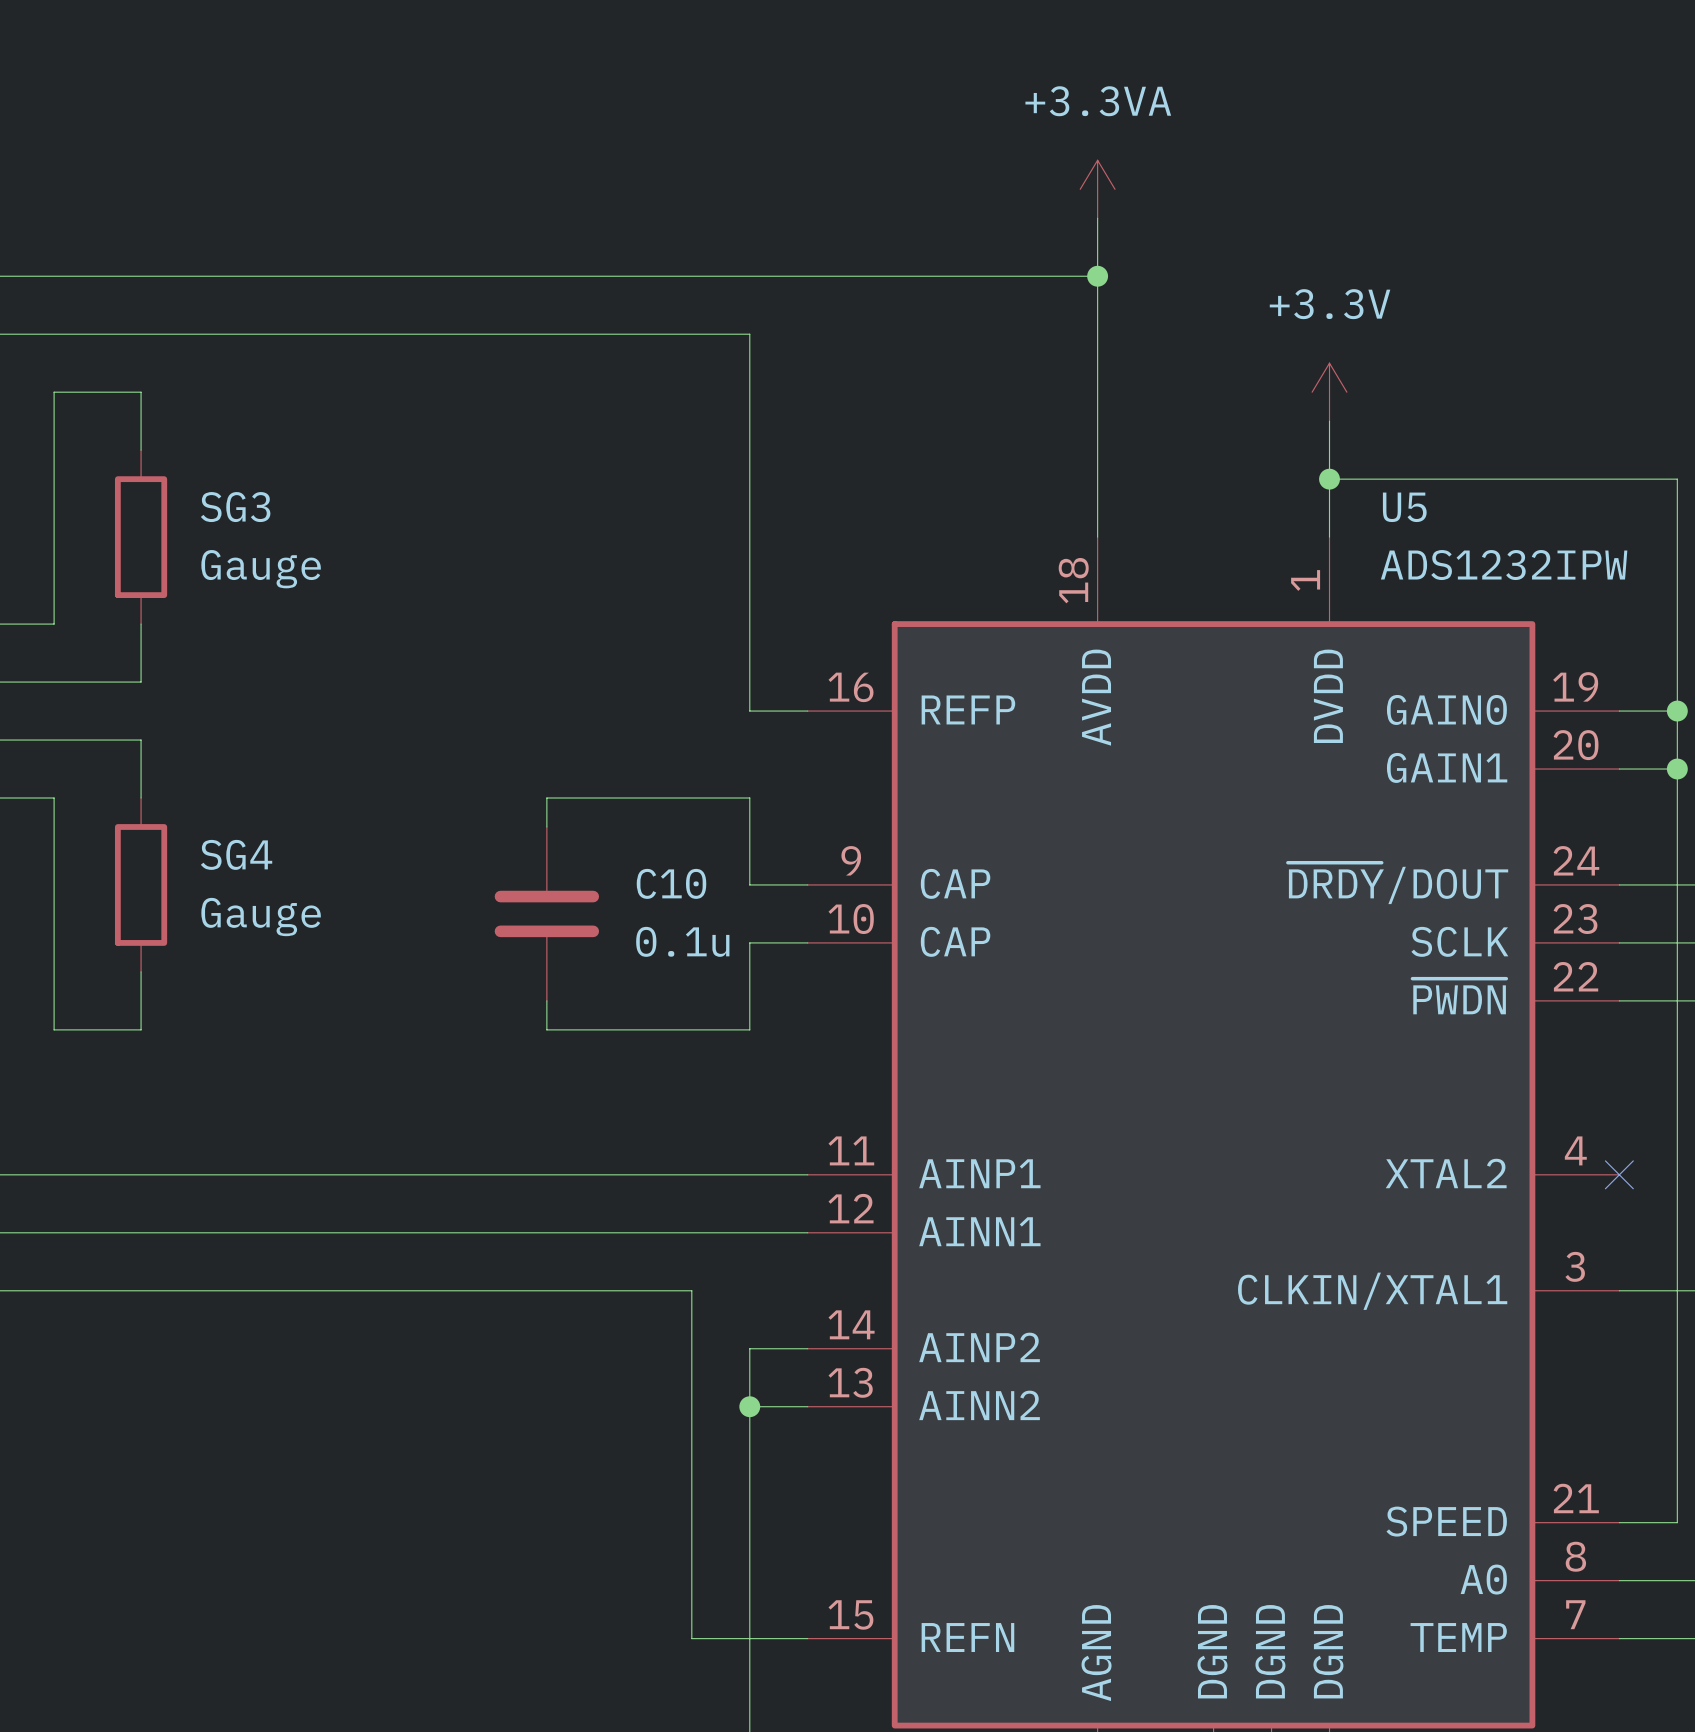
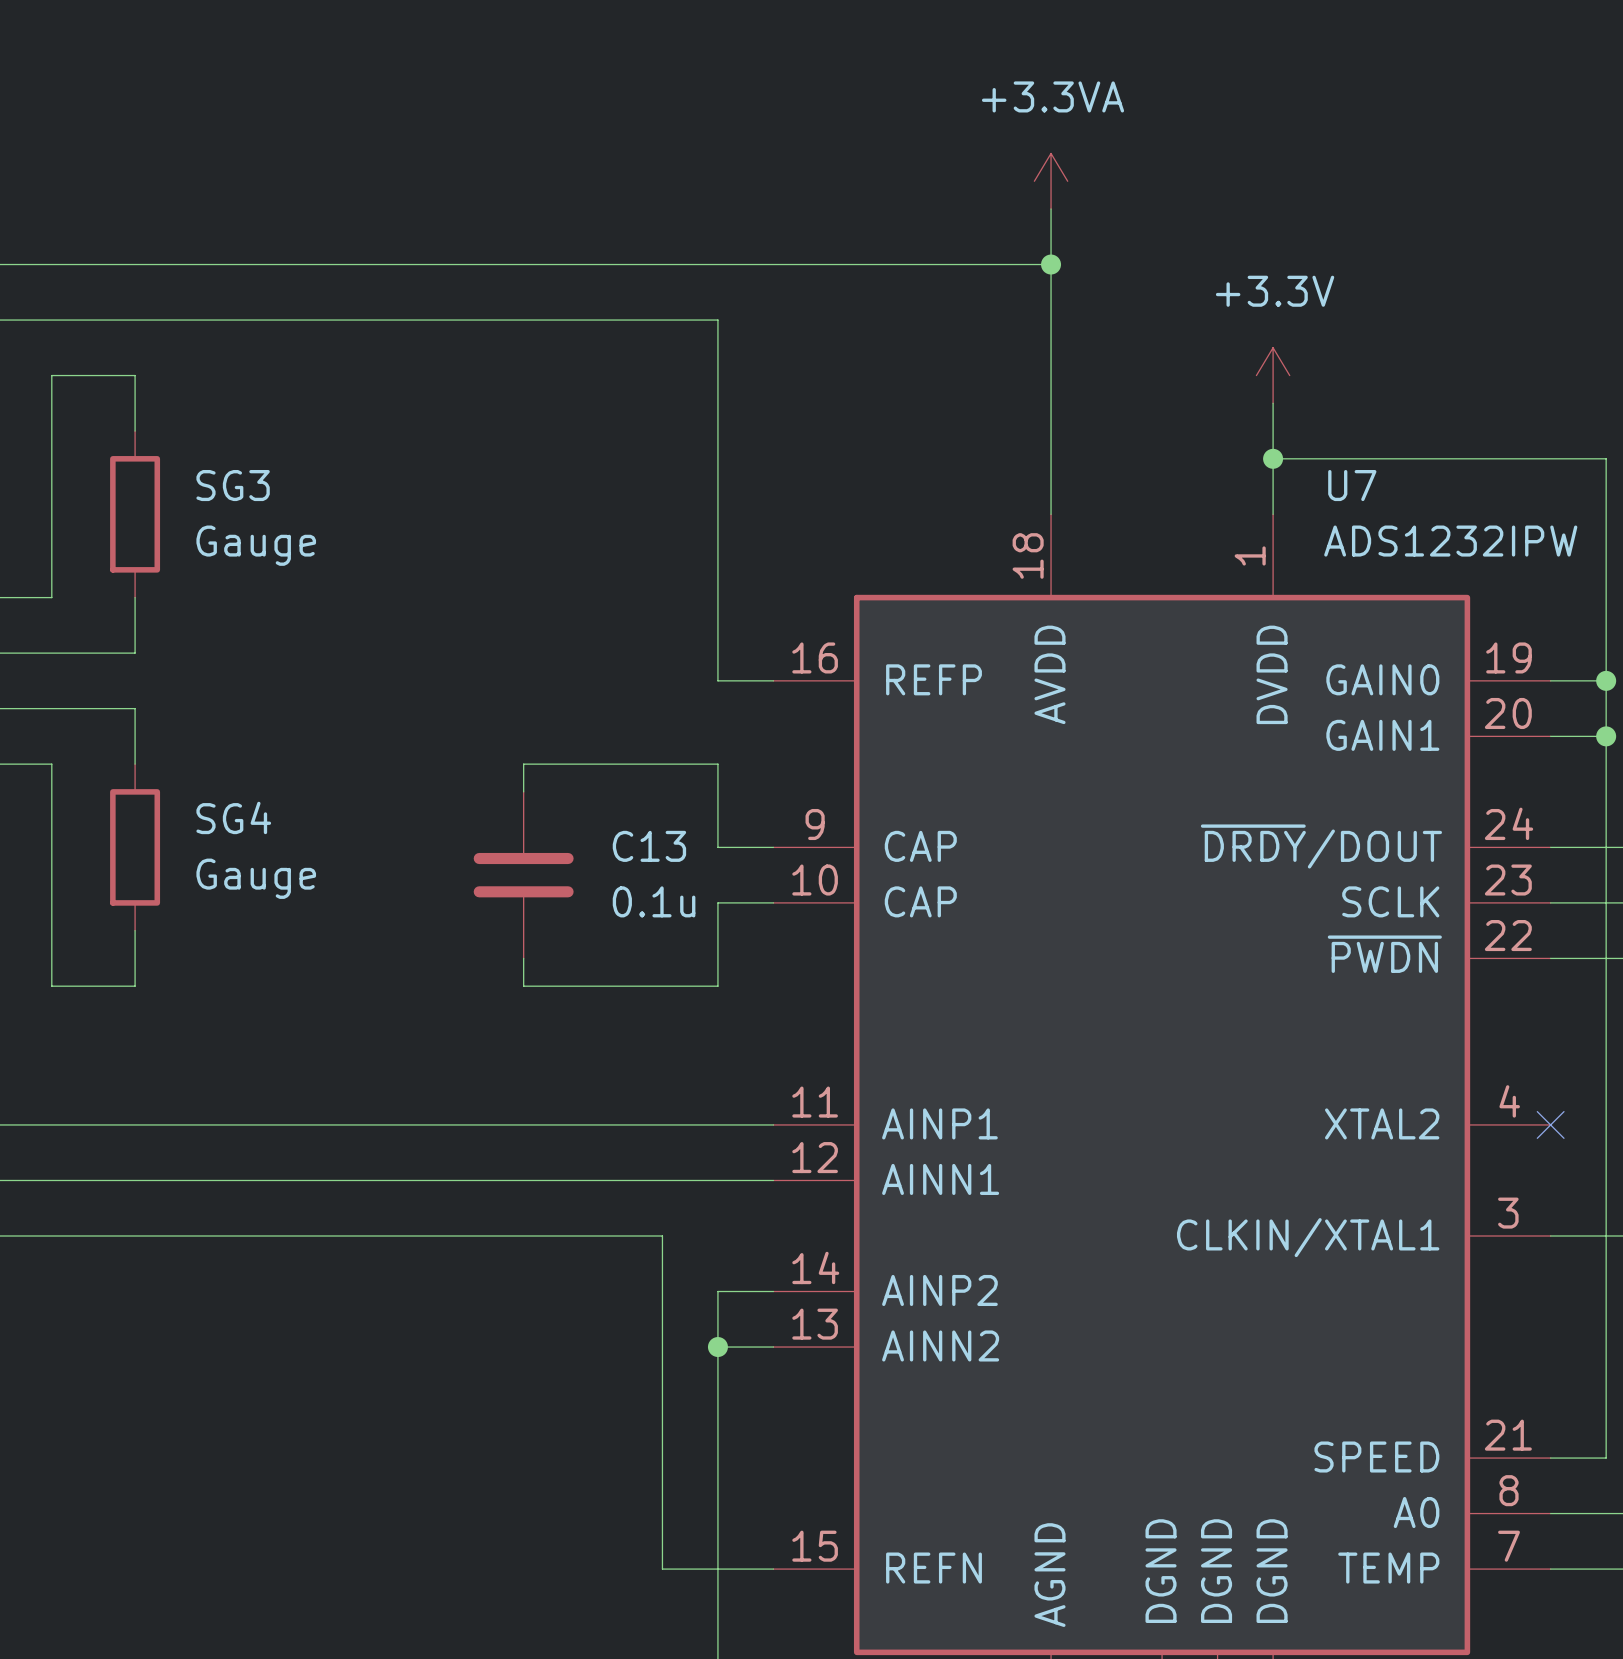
U5 name: U5 (1404, 507) -> U7 (1352, 485)
C10 name: C10 (671, 883) -> C13 (649, 846)

